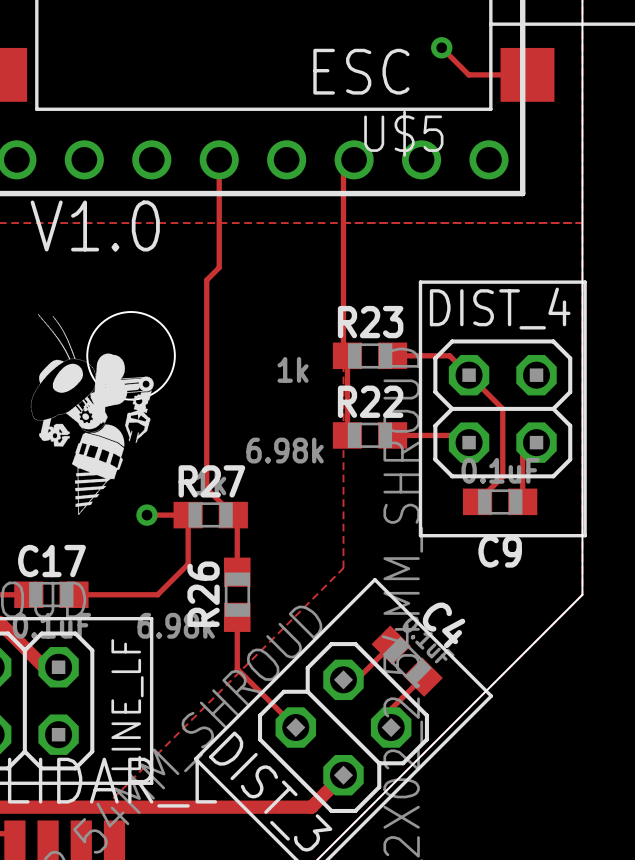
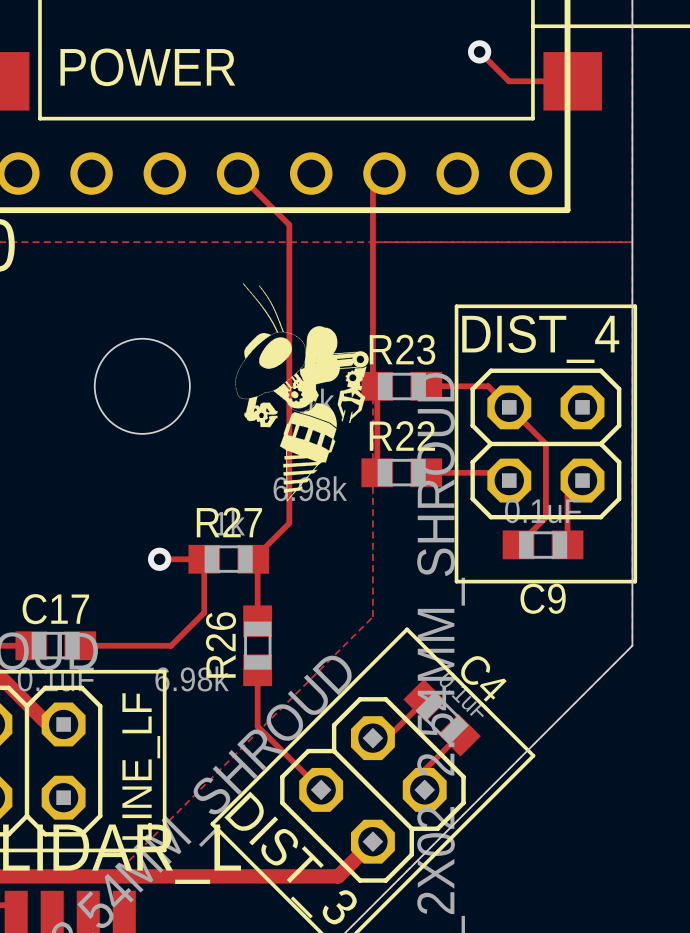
ESC: (361, 71) -> none
U$5 name: U$5 (403, 133) -> POWER (147, 67)
track: (219, 159) (219, 267) (206, 280) (206, 488) (233, 515) -> (238, 173) (289, 224) (289, 523) (253, 559)
drawing position: (92, 414) -> (302, 392)

